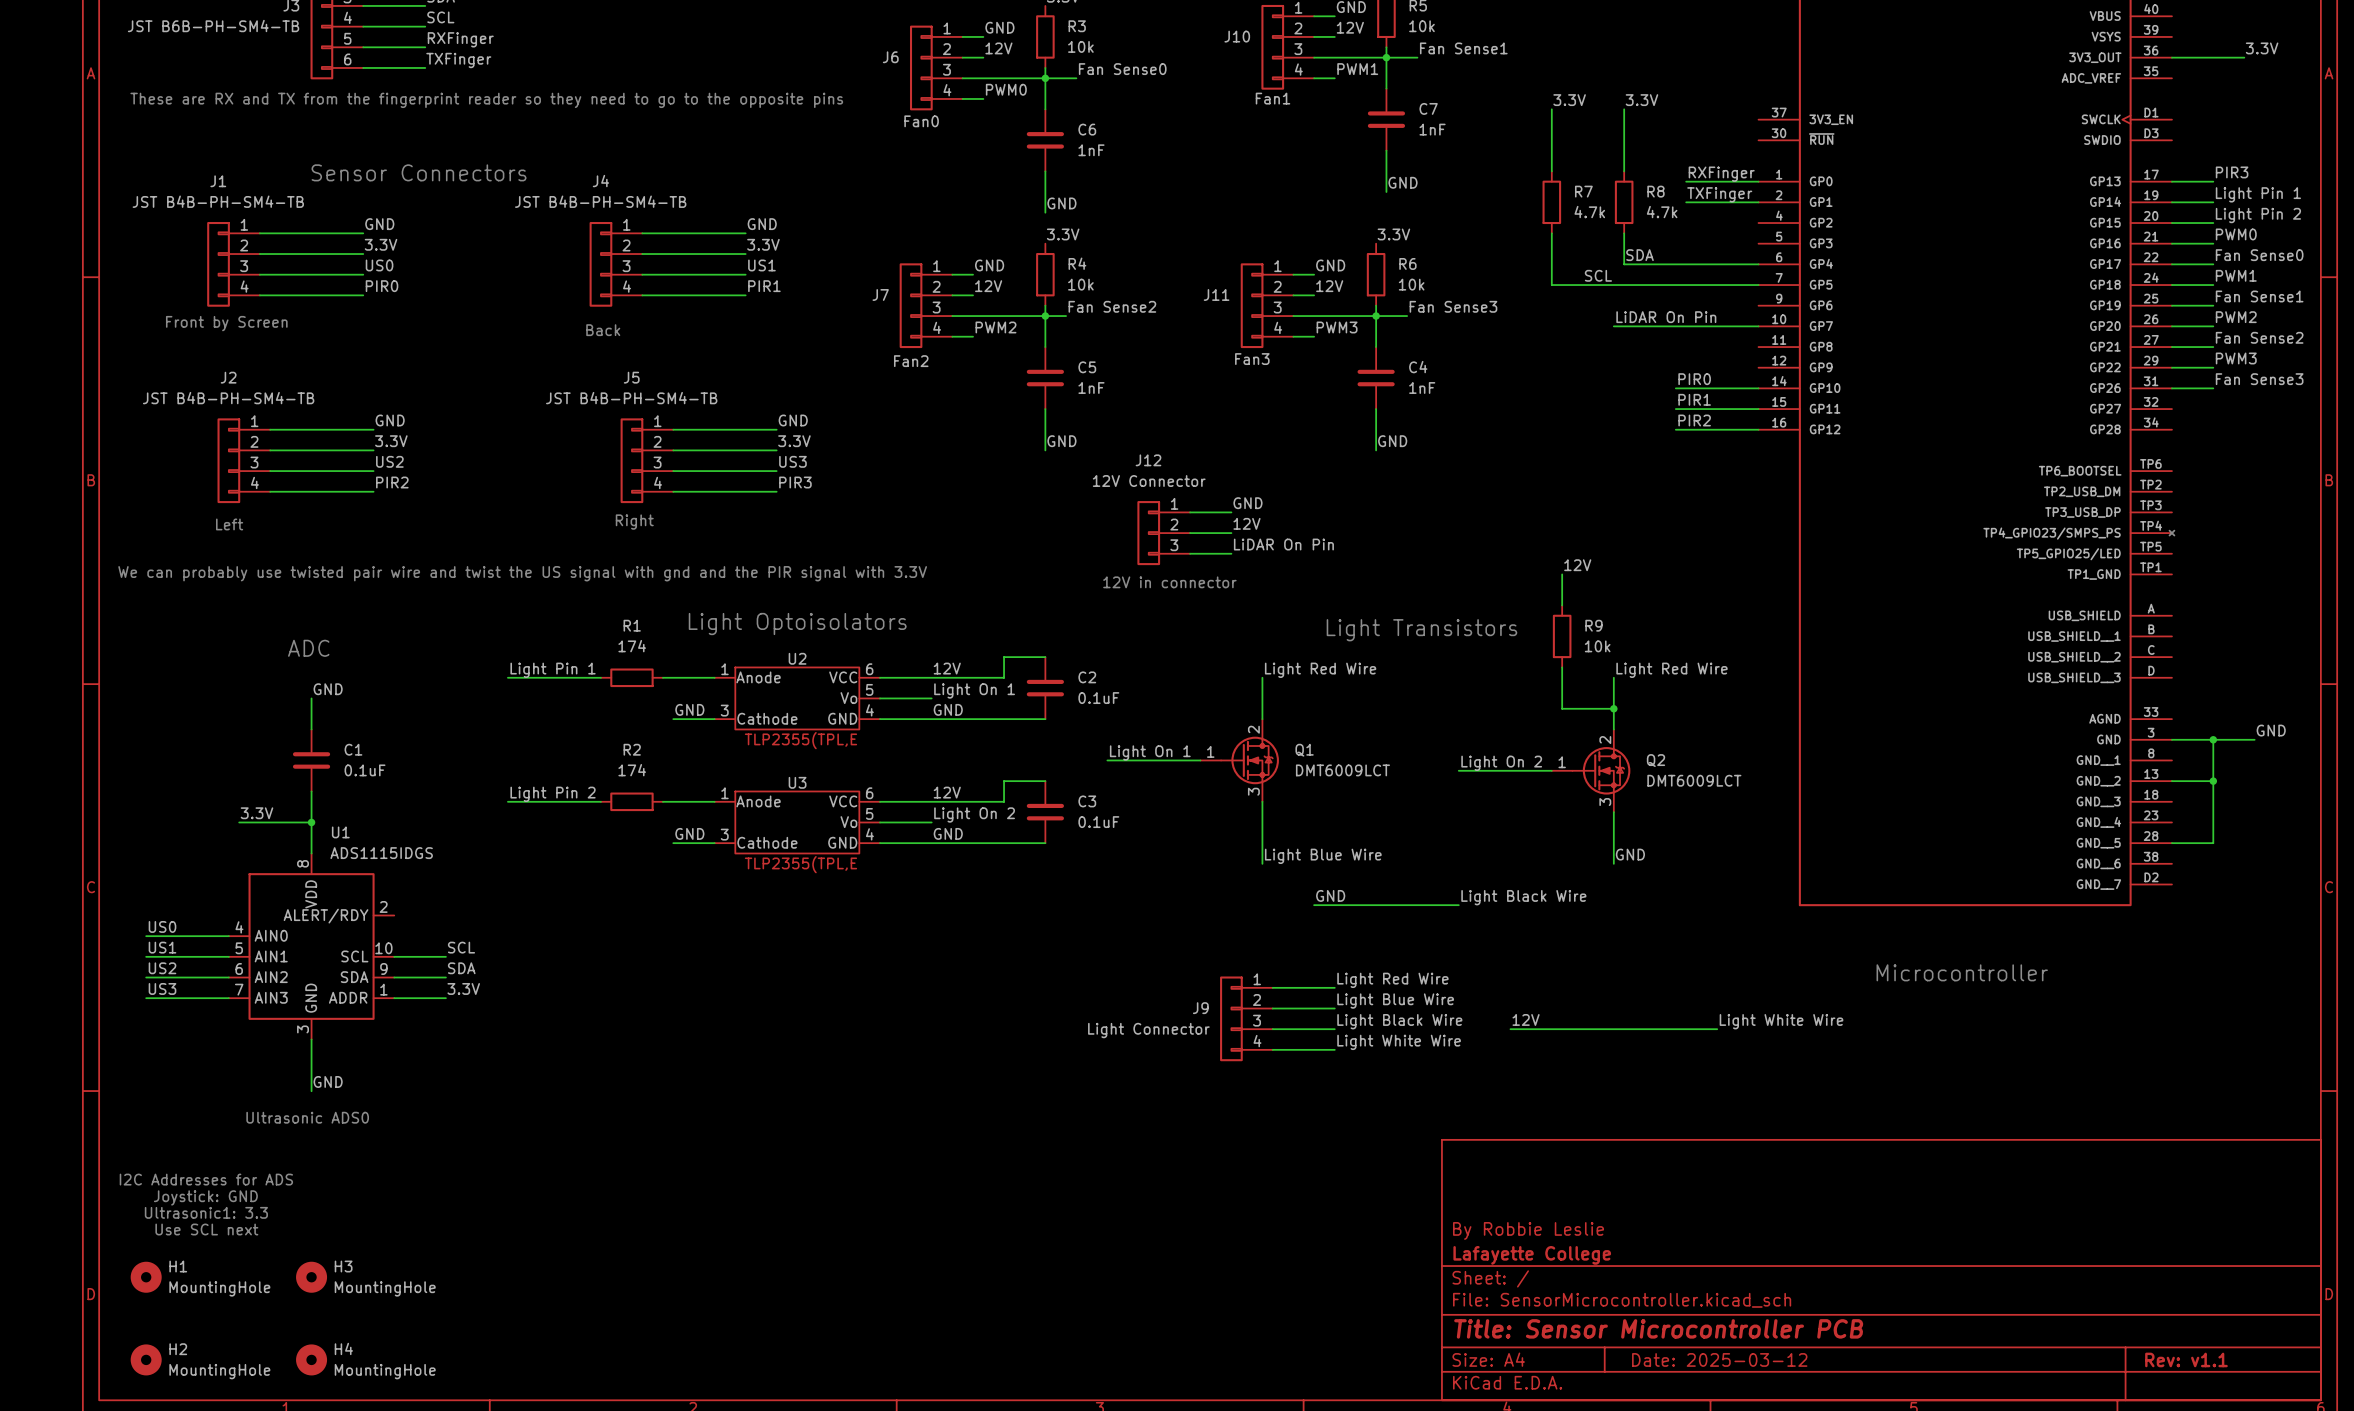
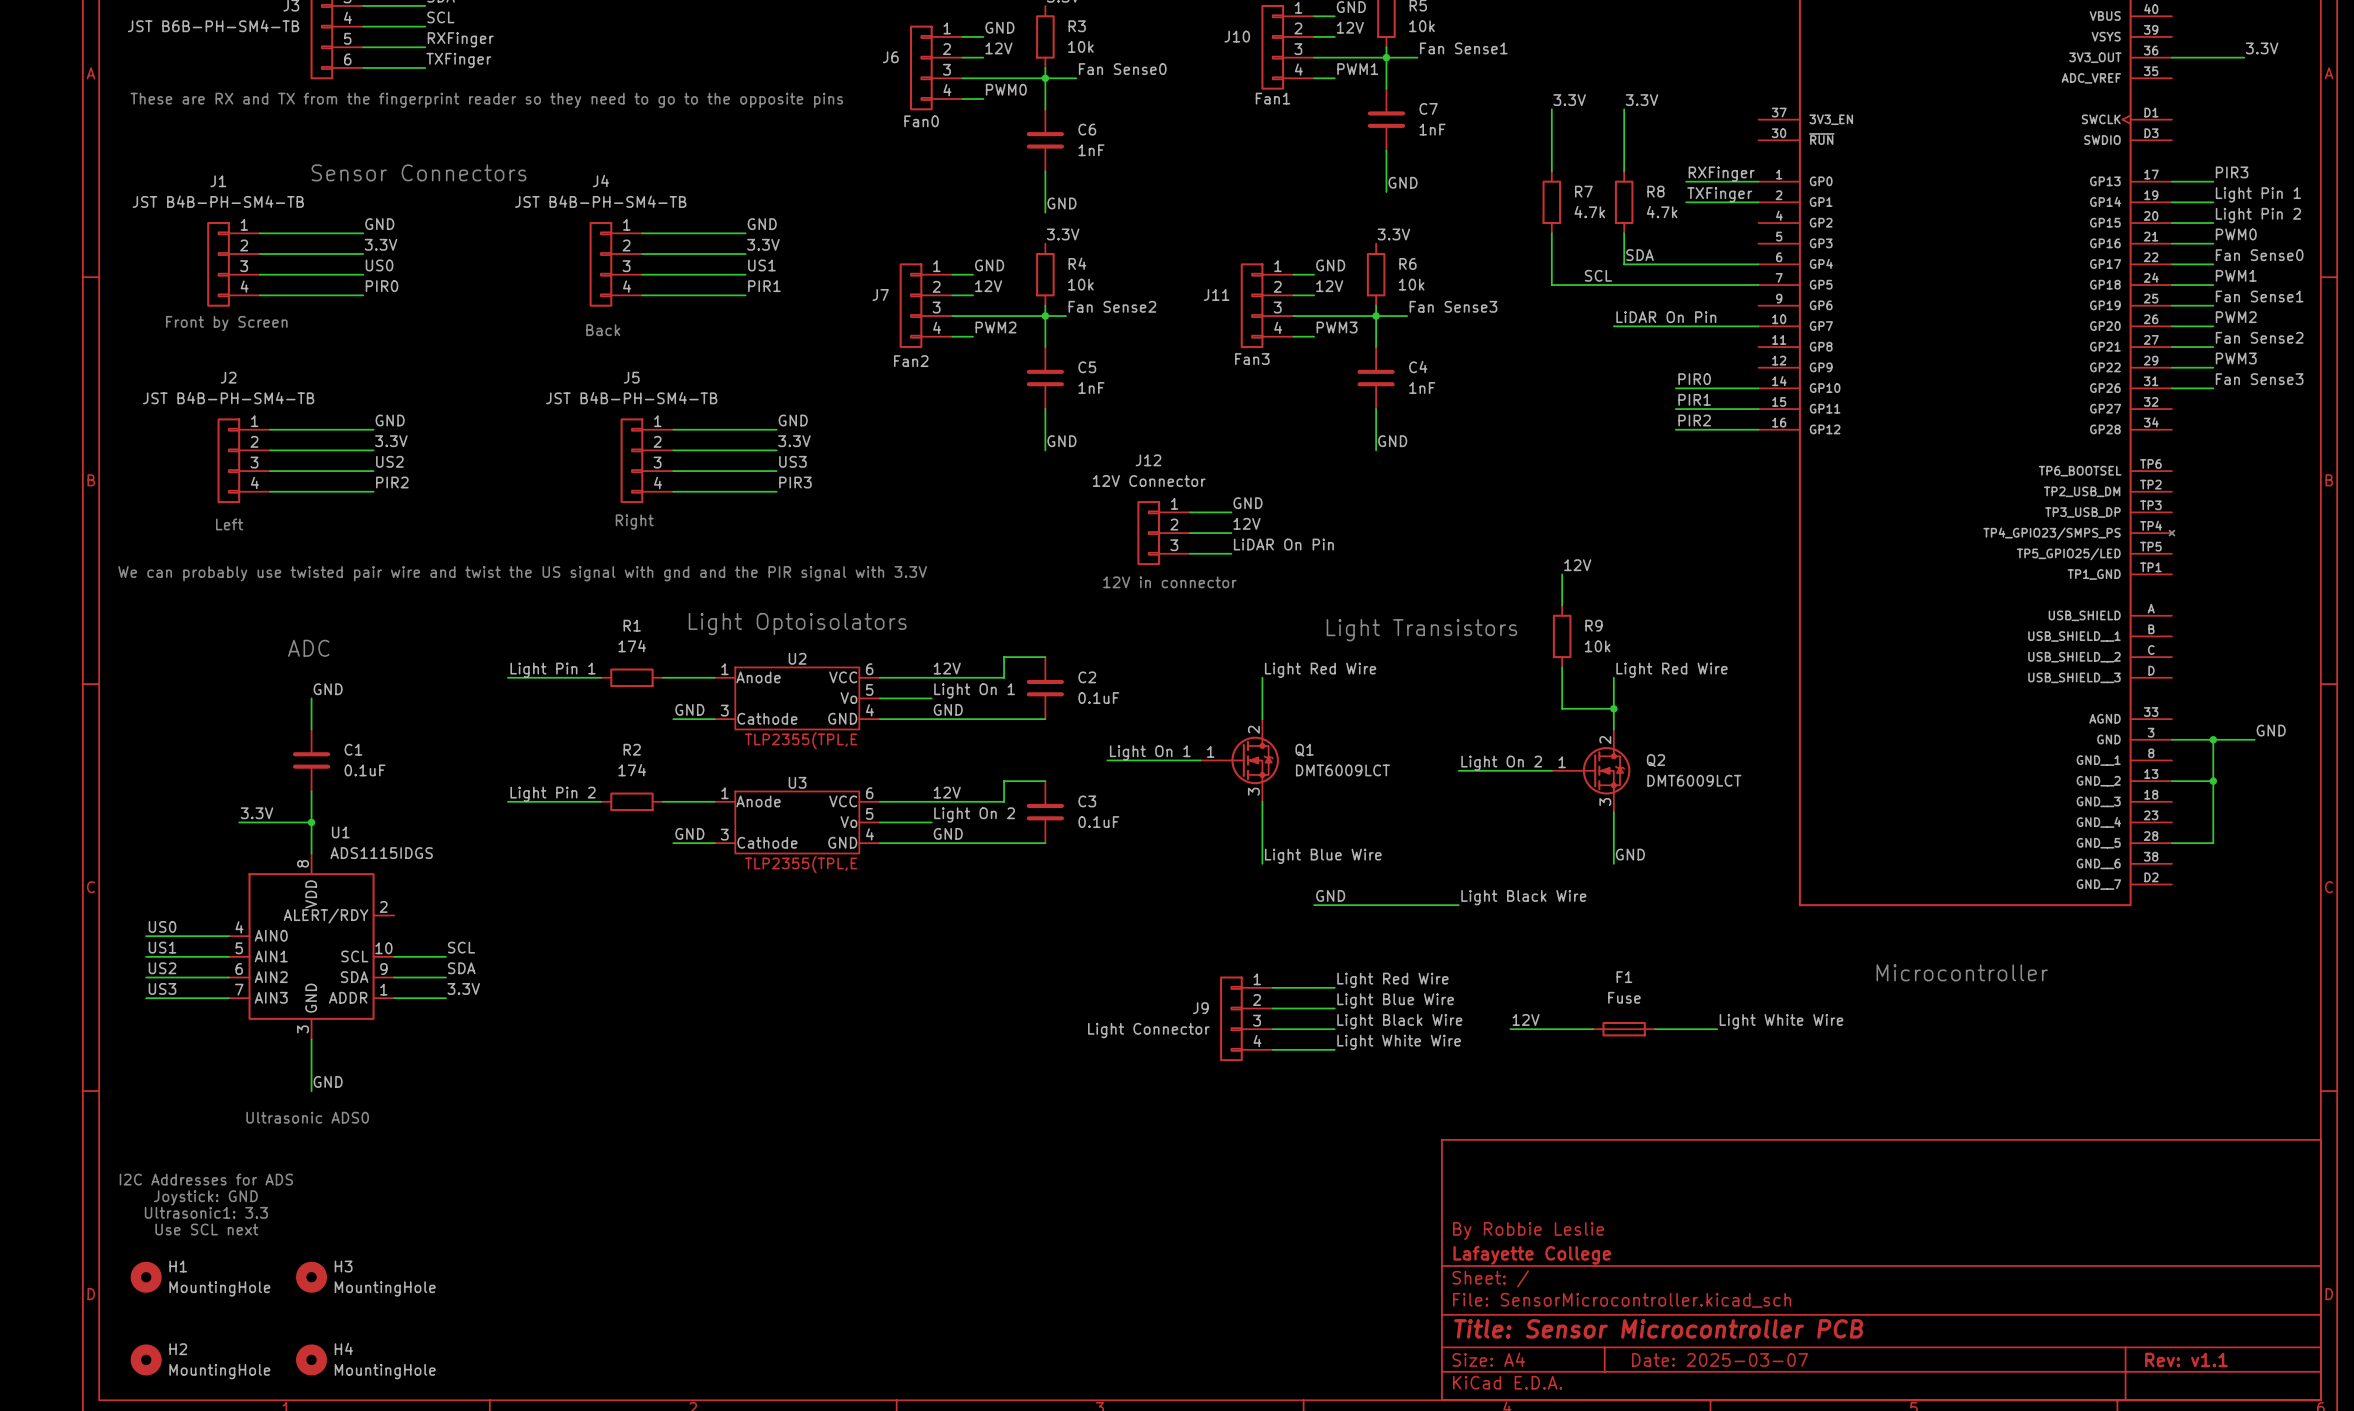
F1: none -> Fuse (1624, 1029)
title block: Date: 2025-03-12 (1719, 1359) -> Date: 2025-03-07 (1720, 1359)

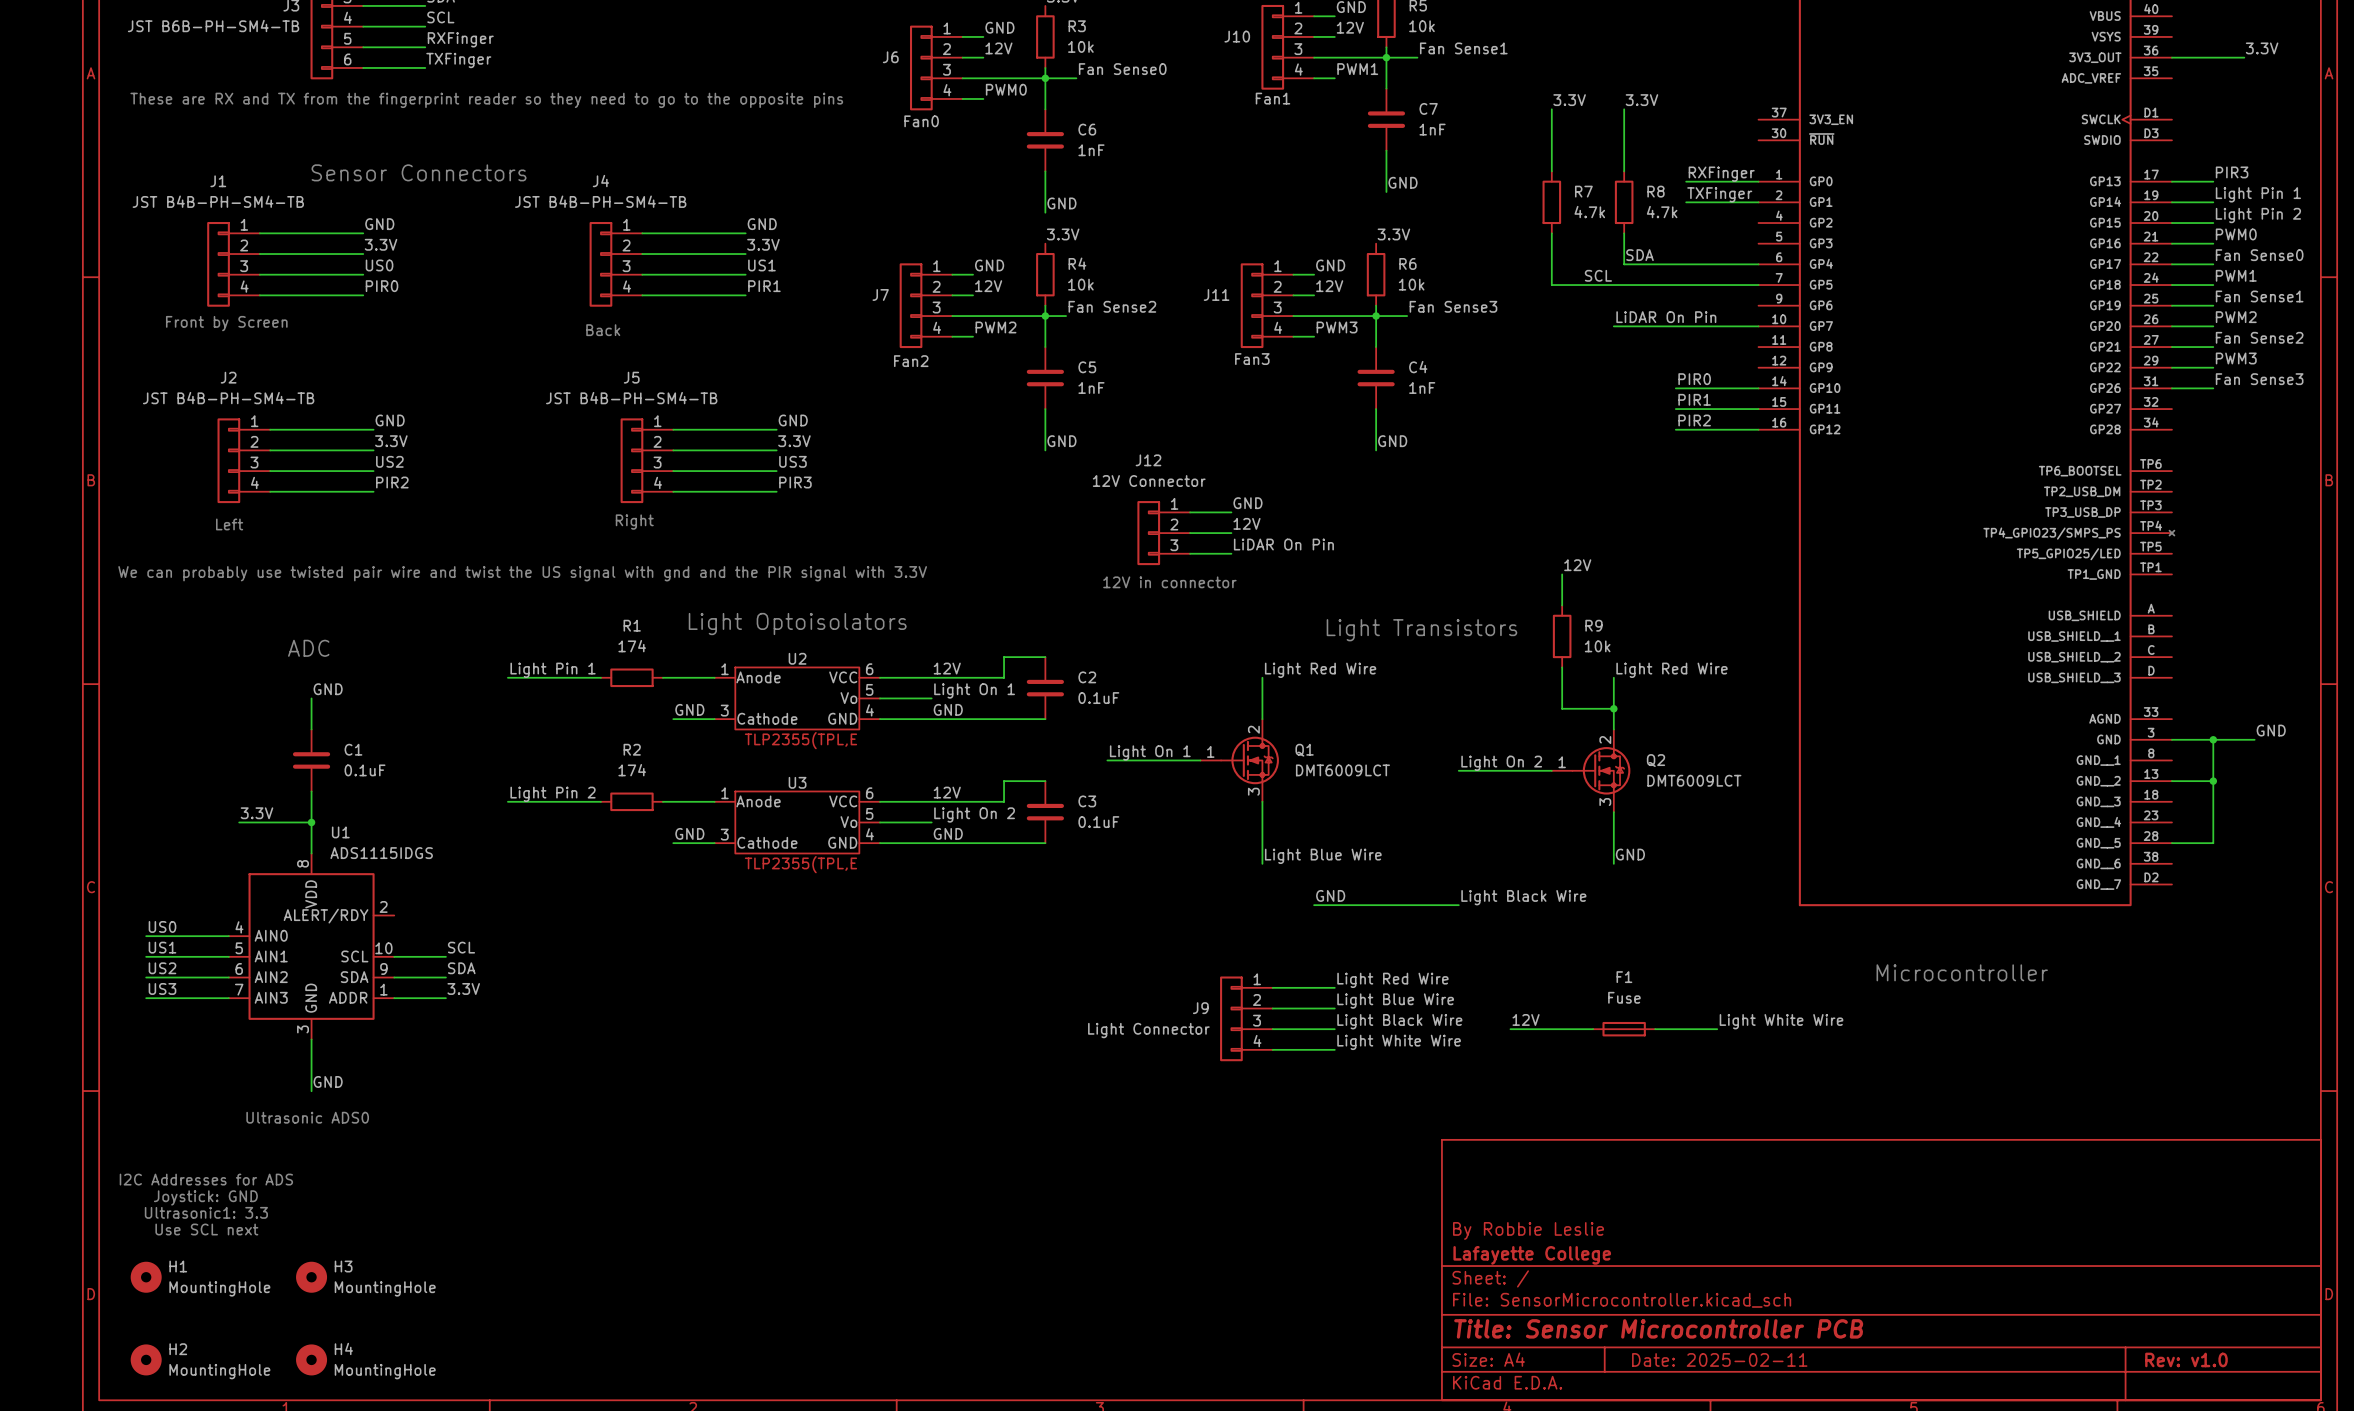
title block: Date: 2025-03-07 (1720, 1359) -> Date: 2025-02-11 (1719, 1359)
title block: Rev: v1.1 (2186, 1359) -> Rev: v1.0 (2186, 1359)

